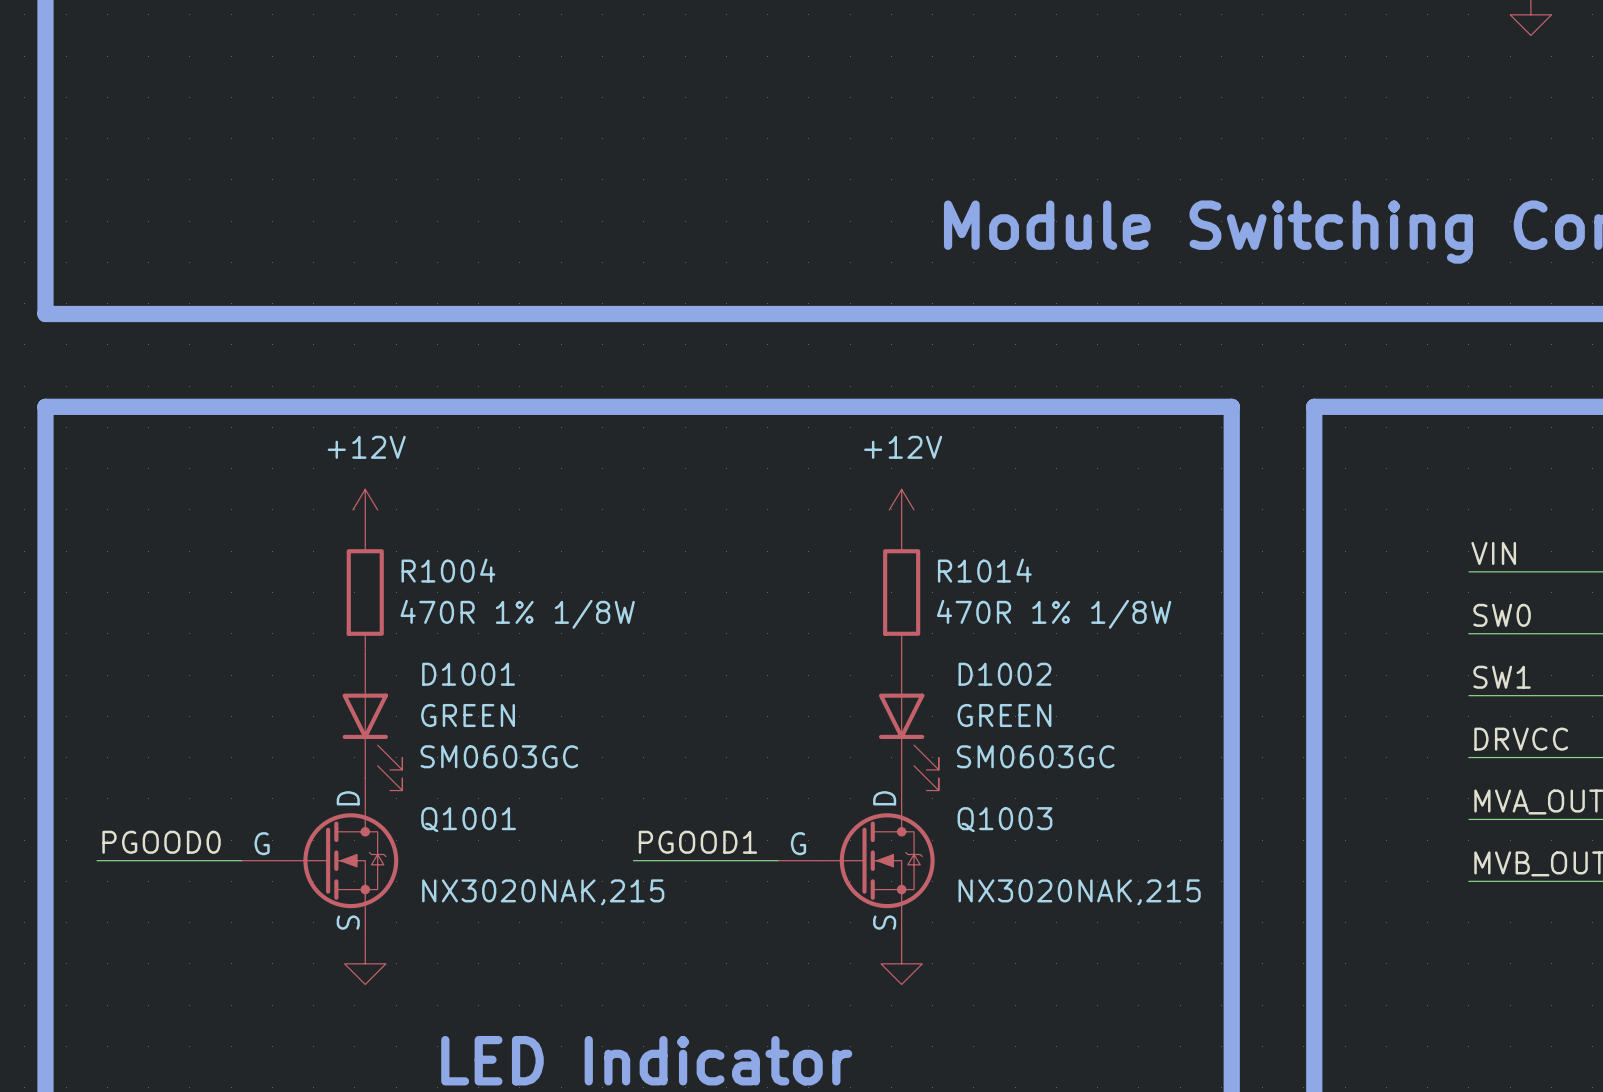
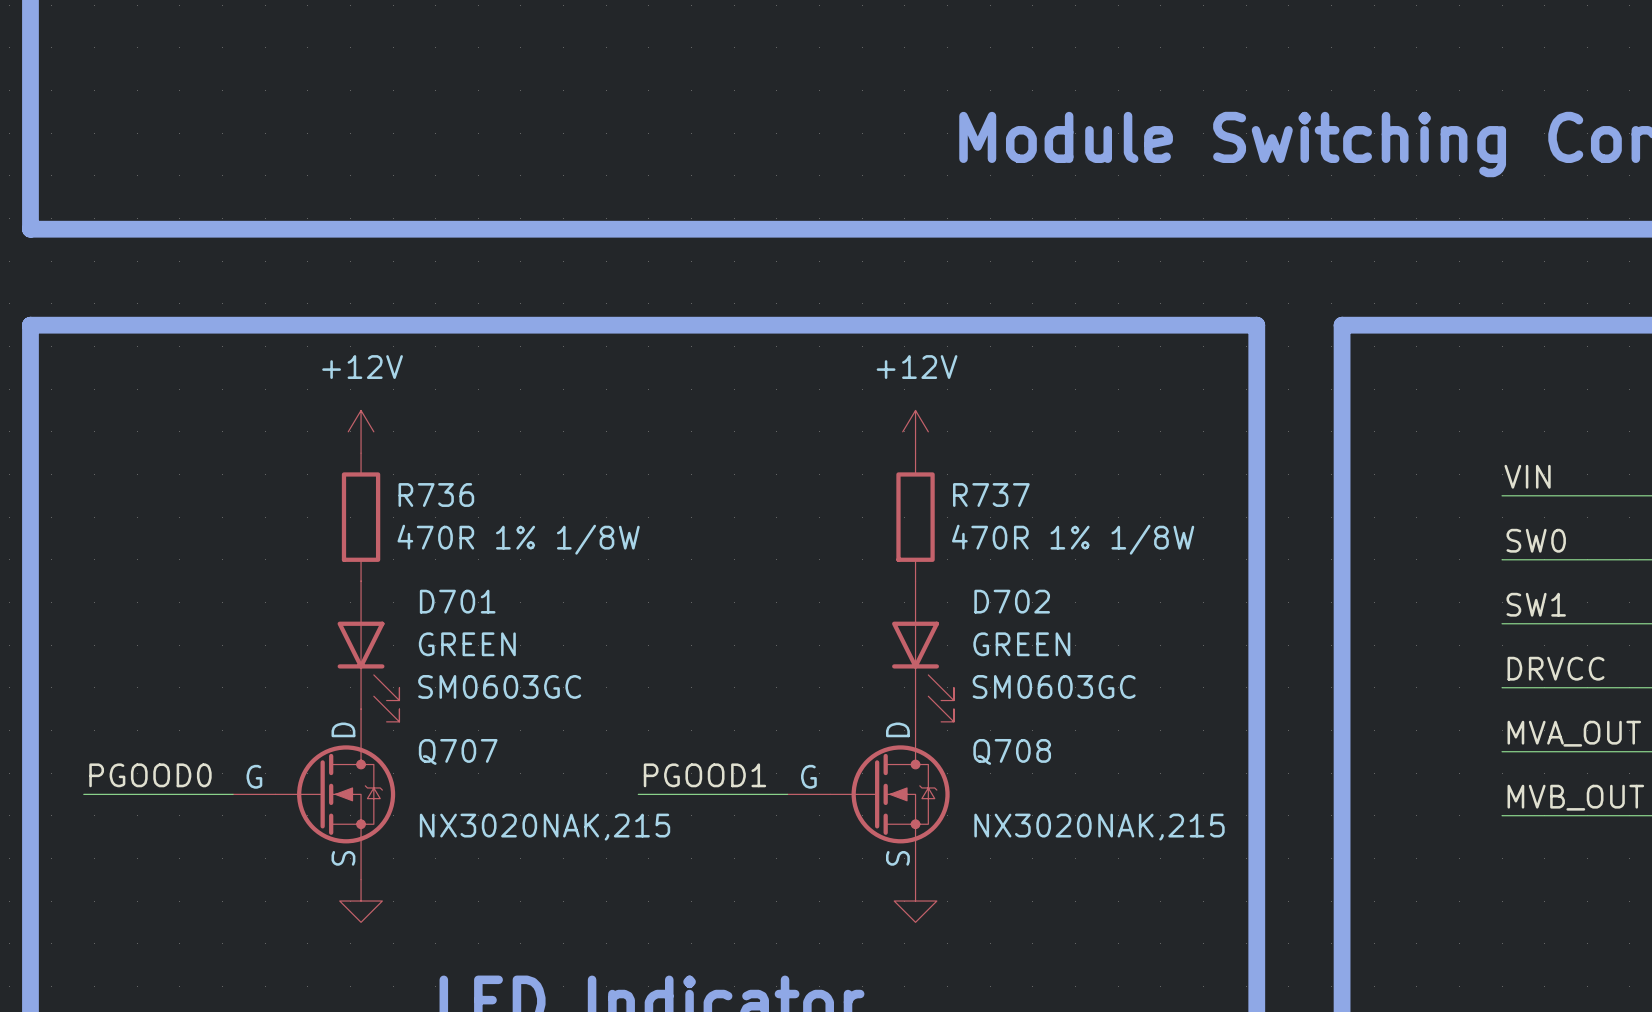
R1004 name: R1004 (448, 570) -> R736 (436, 495)
R1014 name: R1014 (984, 570) -> R737 (991, 495)
D1001 name: D1001 (468, 674) -> D701 (457, 601)
D1002 name: D1002 (1004, 674) -> D702 (1012, 601)
Q1001 name: Q1001 (468, 819) -> Q707 (458, 751)
Q1003 name: Q1003 (1004, 819) -> Q708 (1012, 751)

